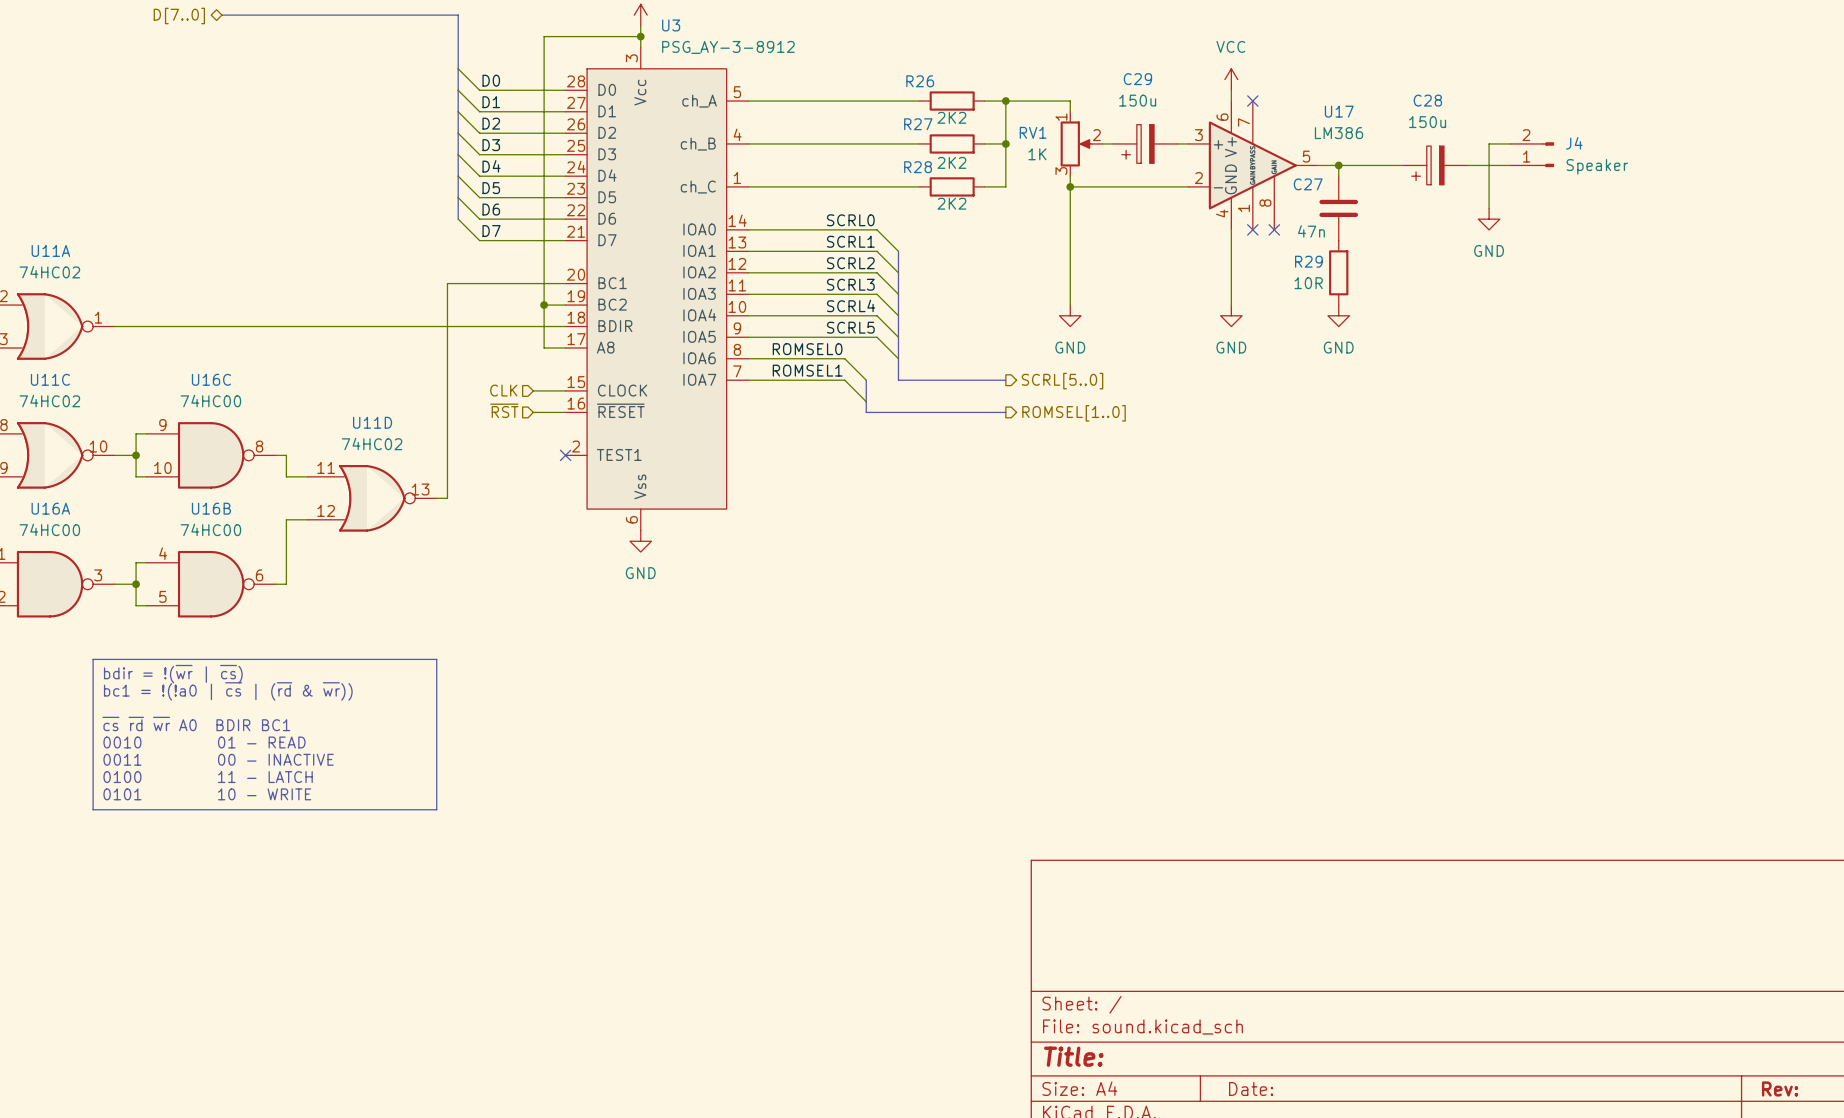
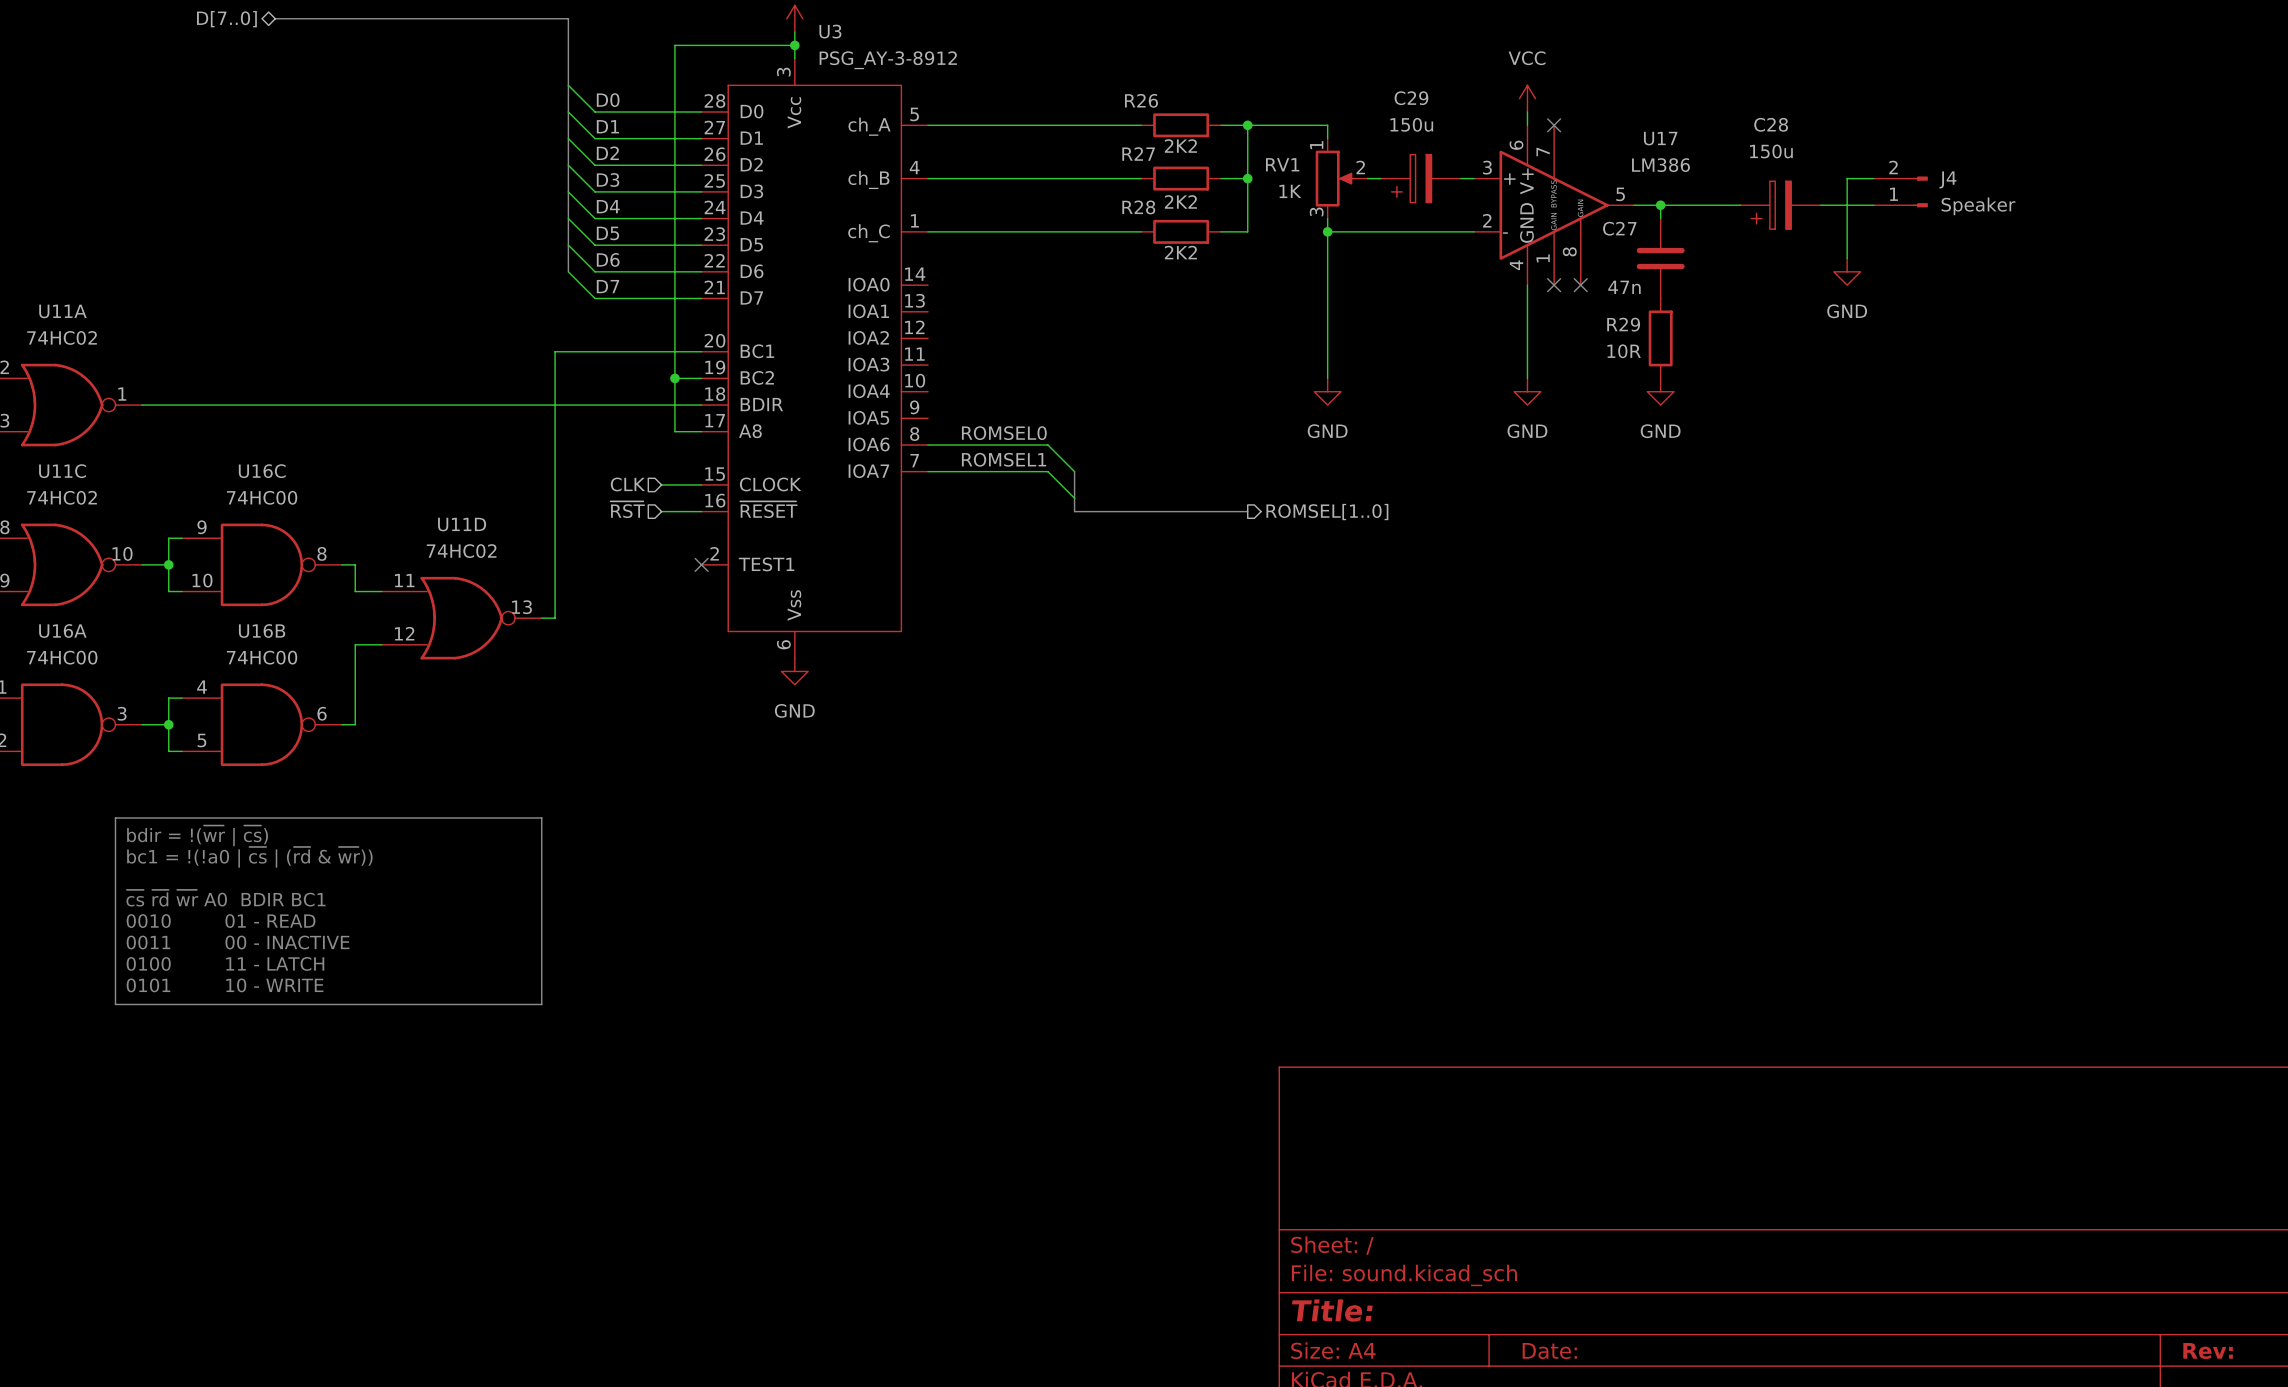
label: SCRL0 (850, 220) -> none
wire: (748, 229) (876, 229) (898, 251) -> none
label: SCRL1 (850, 241) -> none
wire: (748, 251) (876, 251) (898, 272) -> none
bus: (898, 251) (898, 380) (1005, 380) -> none
label: SCRL2 (850, 263) -> none
wire: (748, 272) (876, 272) (898, 294) -> none
label: SCRL3 (850, 284) -> none
wire: (748, 294) (876, 294) (898, 315) -> none
label: SCRL4 (851, 305) -> none
wire: (748, 315) (876, 315) (898, 337) -> none
label: SCRL5 (850, 327) -> none
wire: (748, 337) (876, 337) (898, 358) -> none
hierarchical label: SCRL[5..0] (1062, 381) -> none

